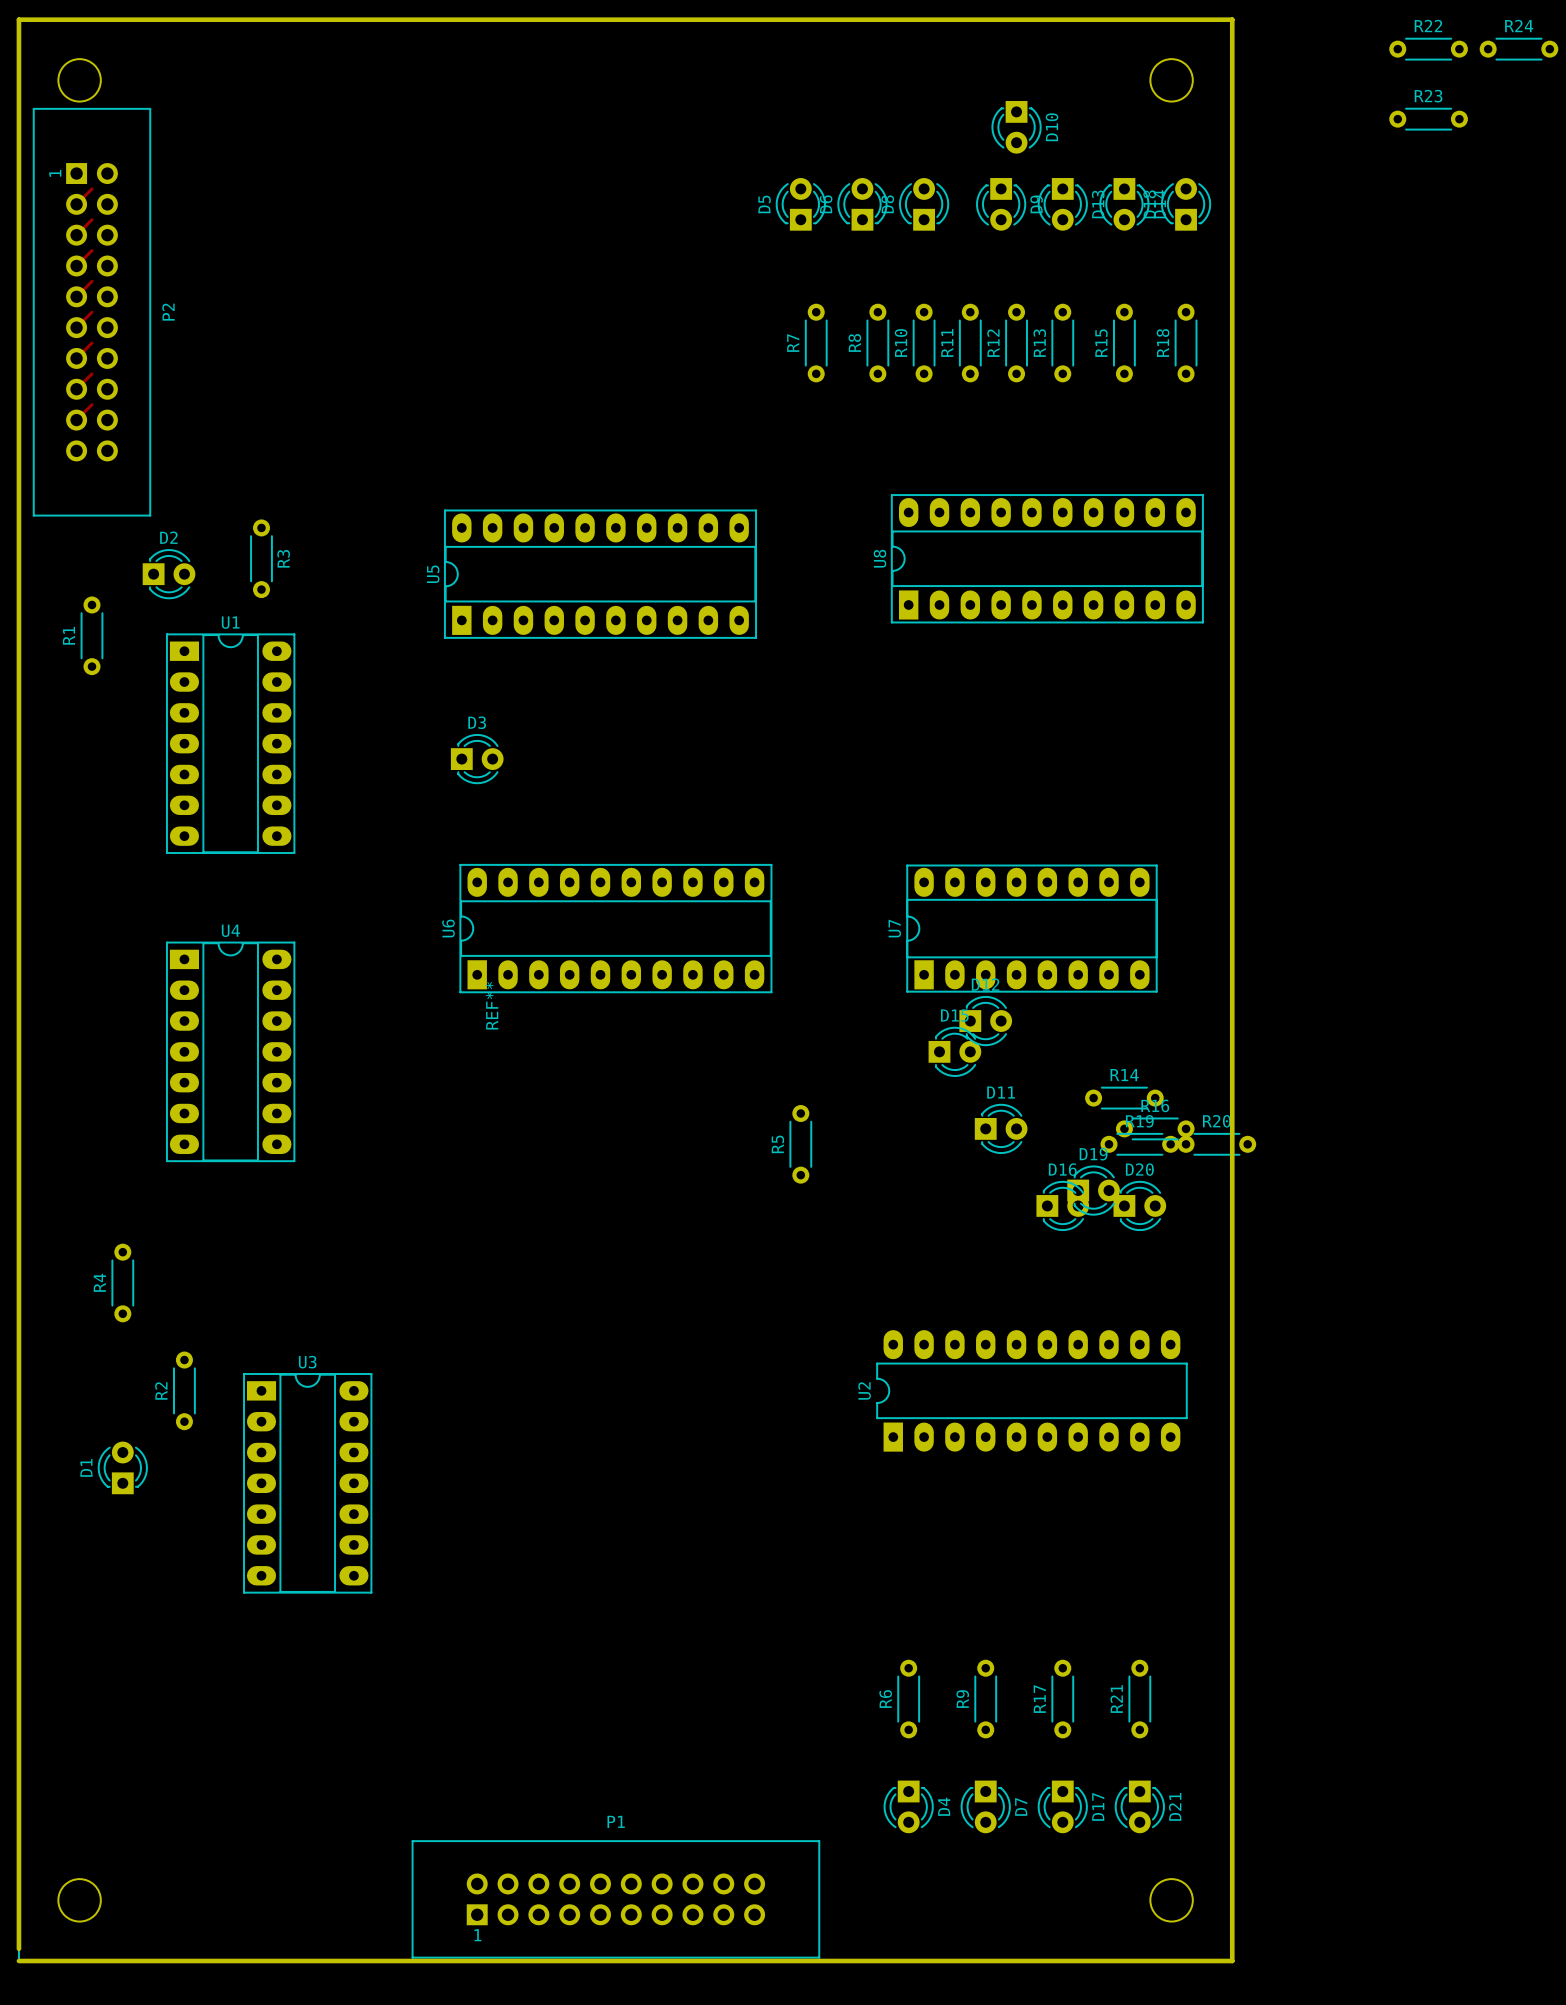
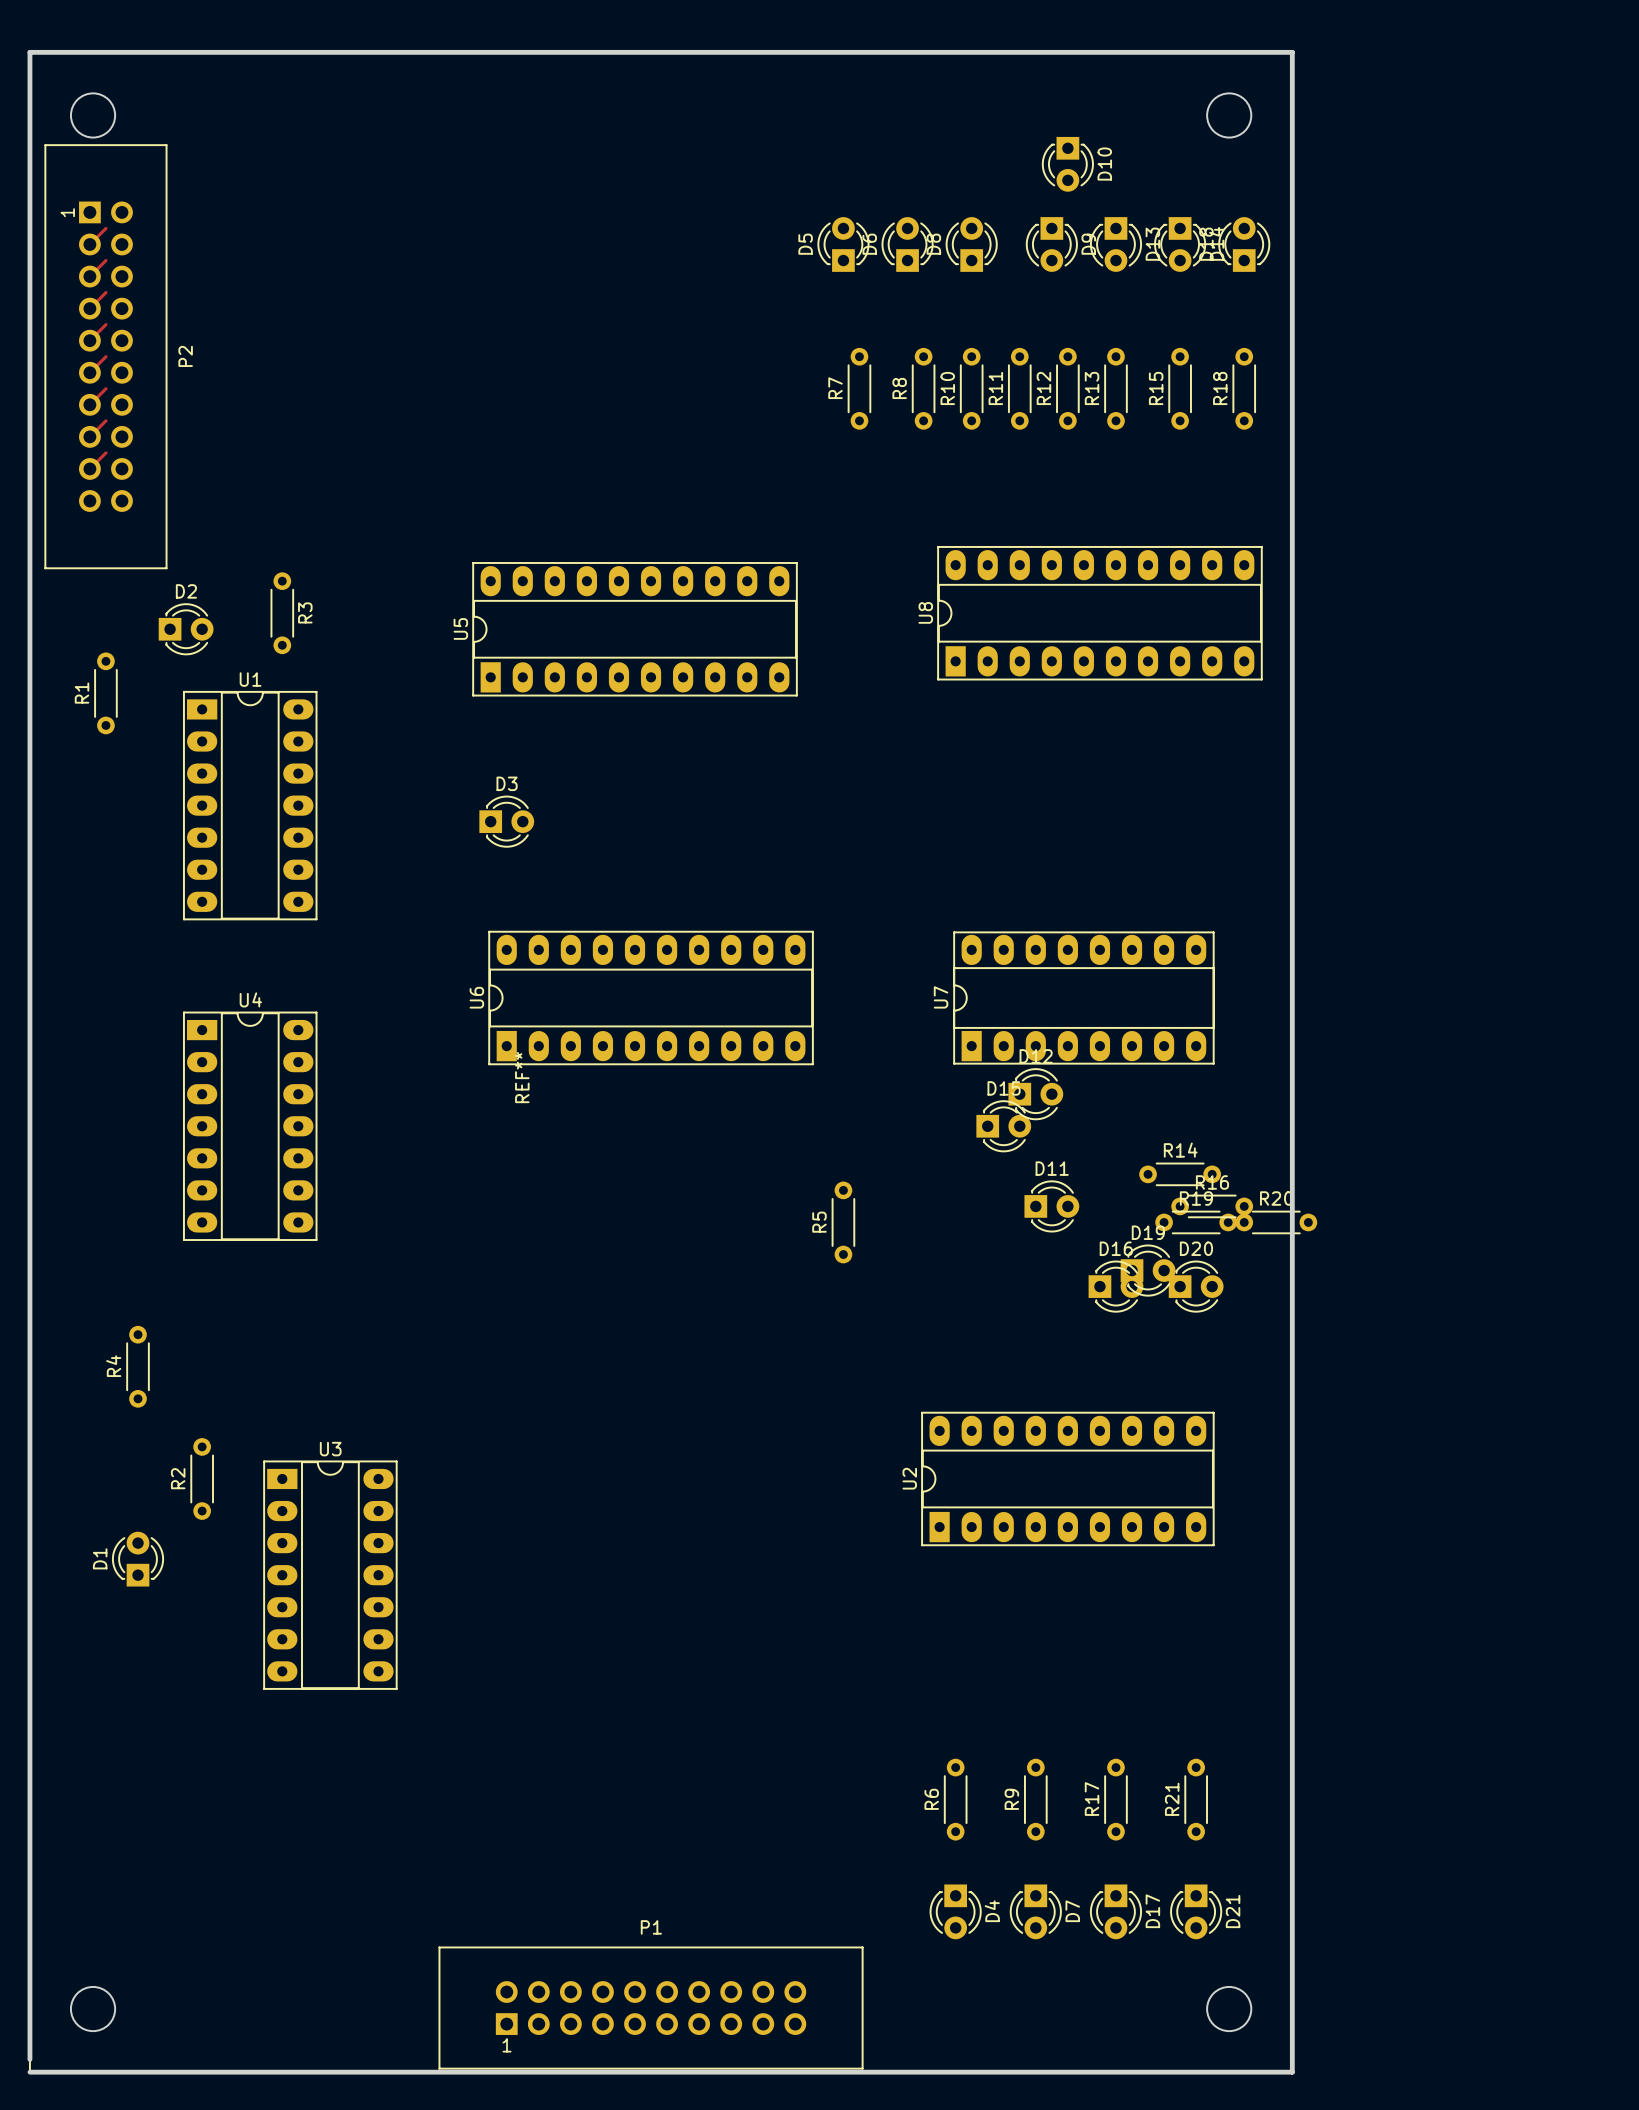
R22: (1428, 49) -> none
R24: (1518, 49) -> none
R23: (1428, 119) -> none
U2 footprint: [876, 1330, 1188, 1452] -> [921, 1411, 1215, 1547]

